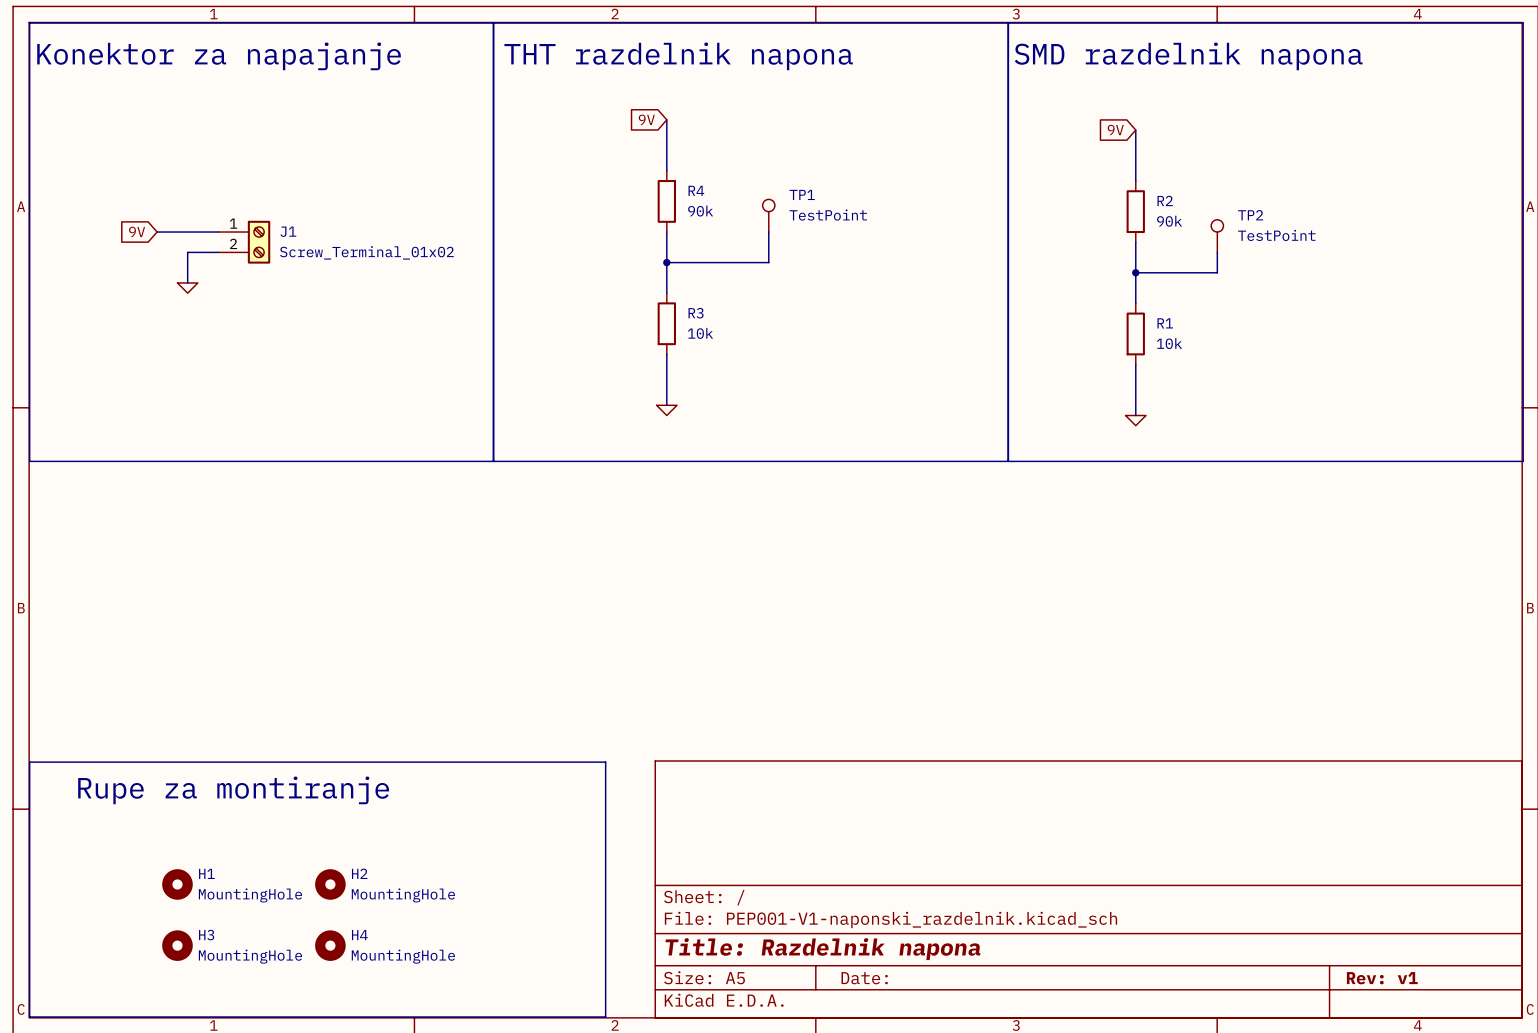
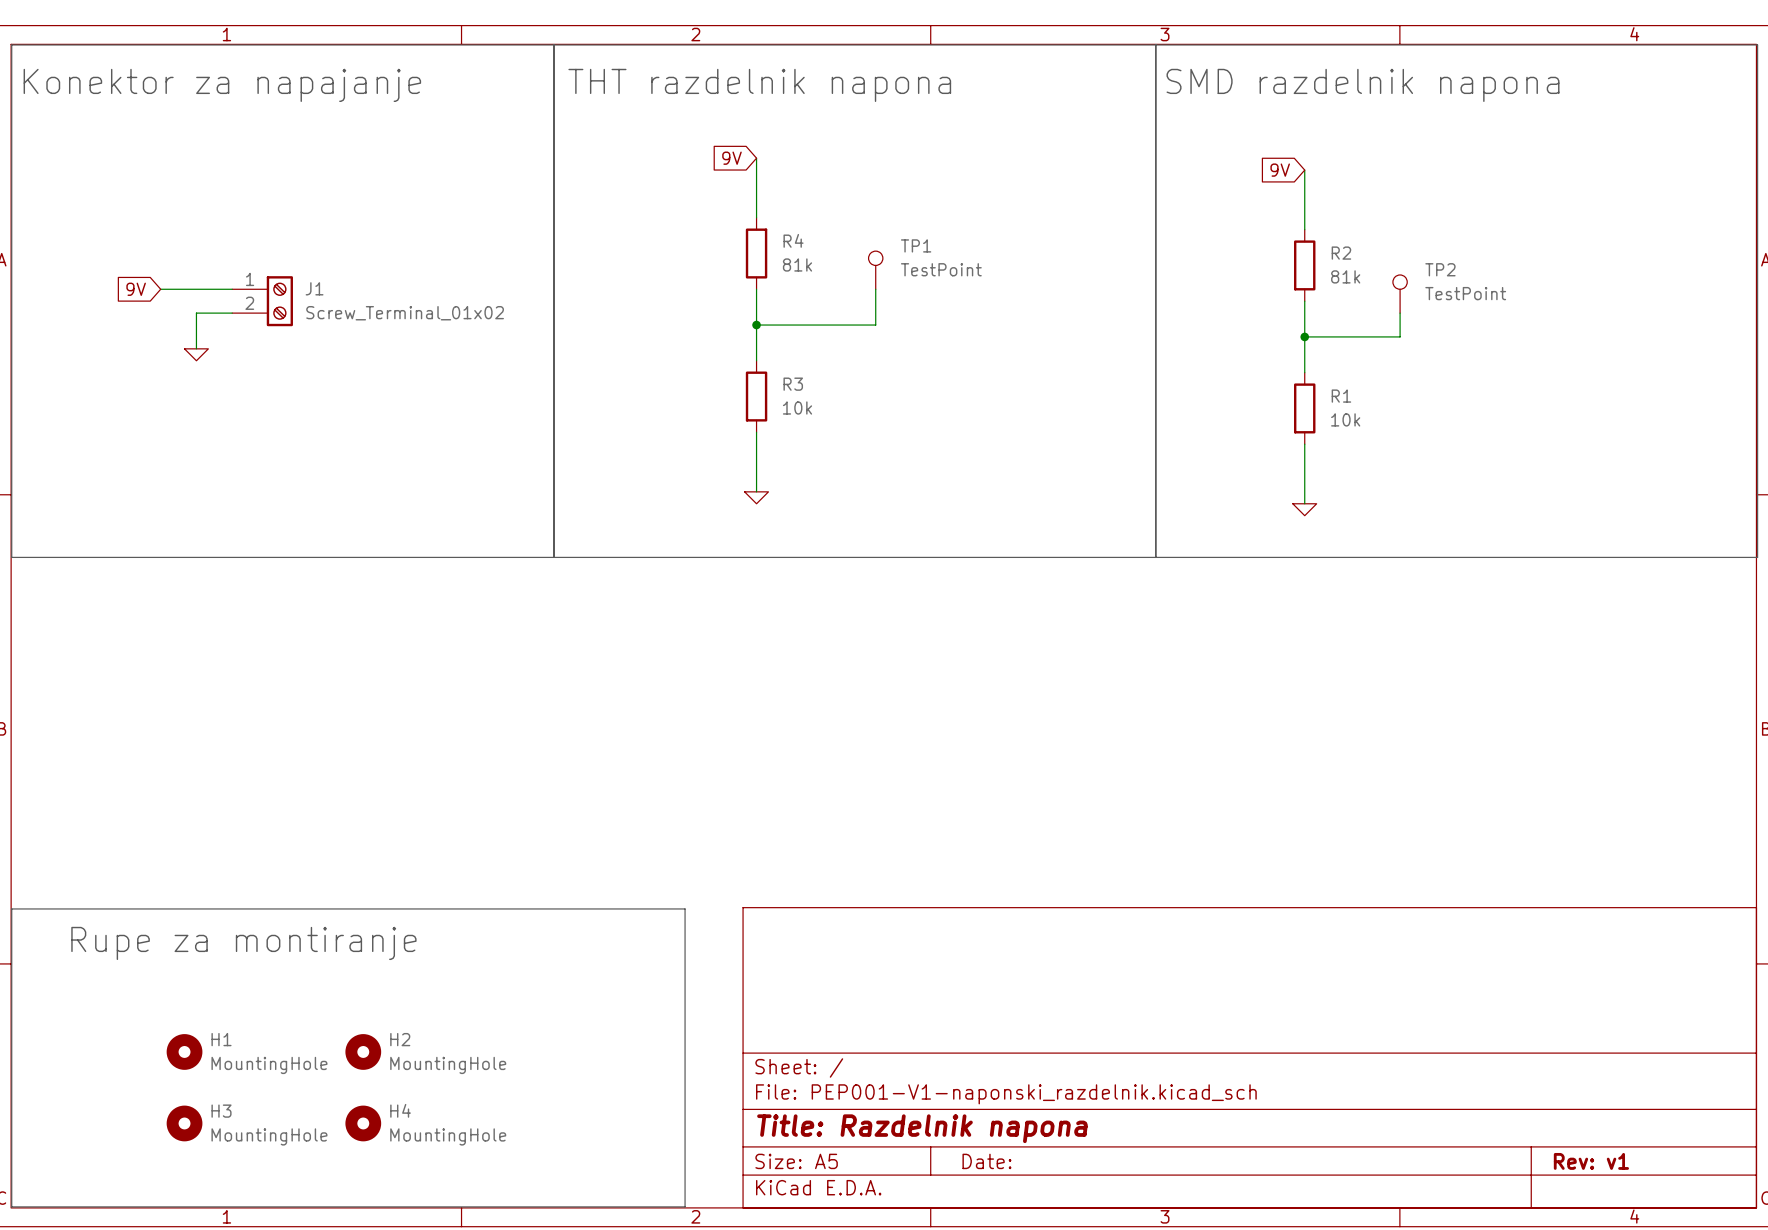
R4 value: 90k (700, 211) -> 81k (797, 264)
R2 value: 90k (1169, 221) -> 81k (1345, 276)

